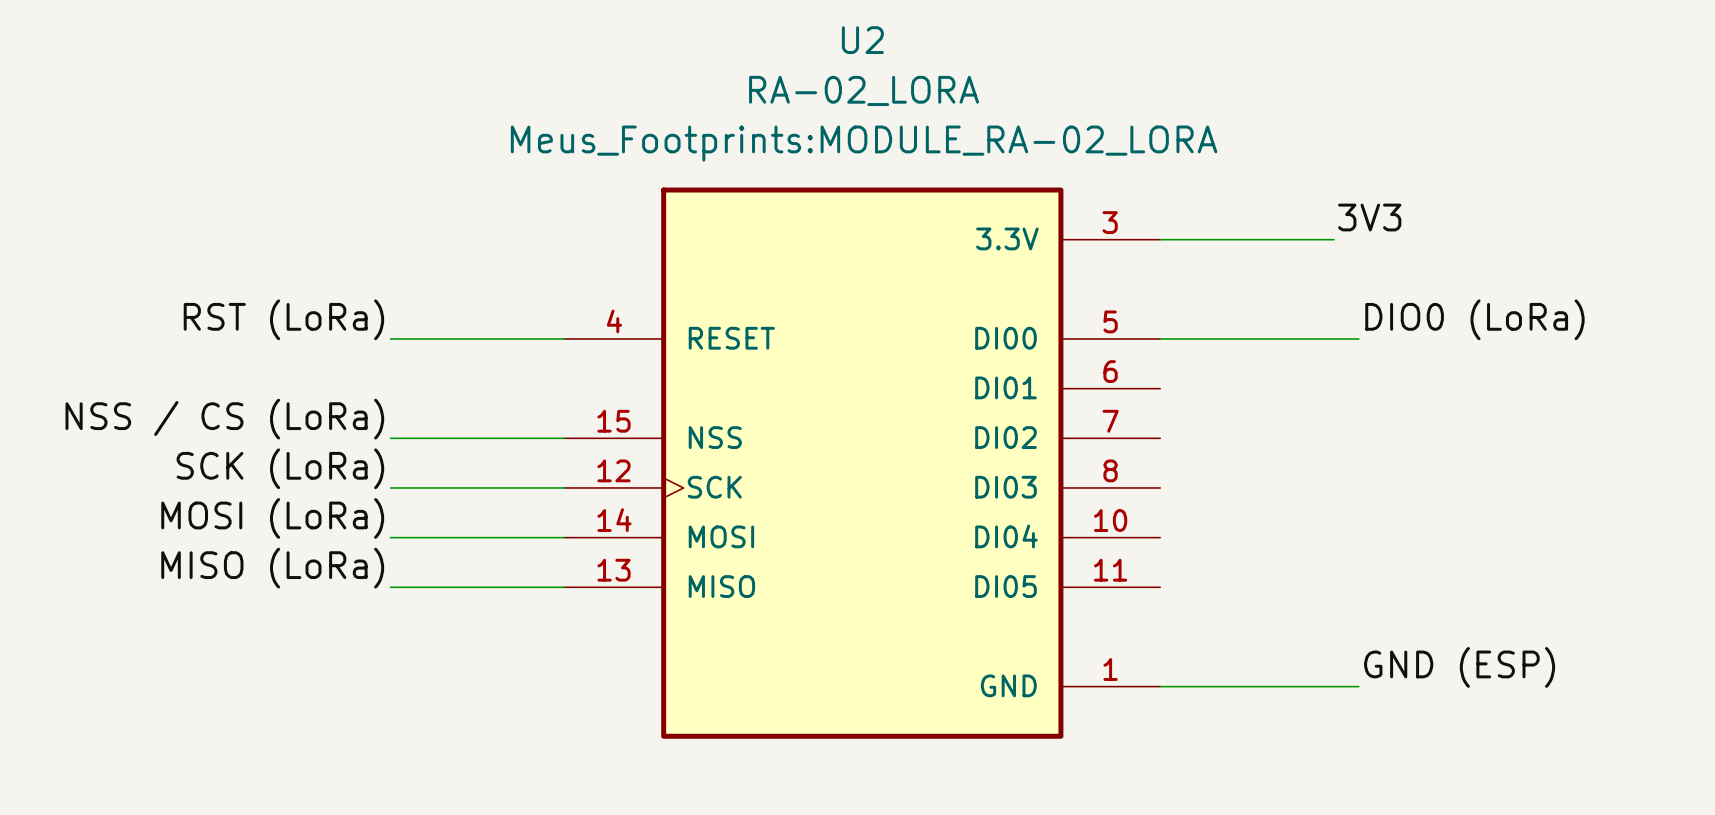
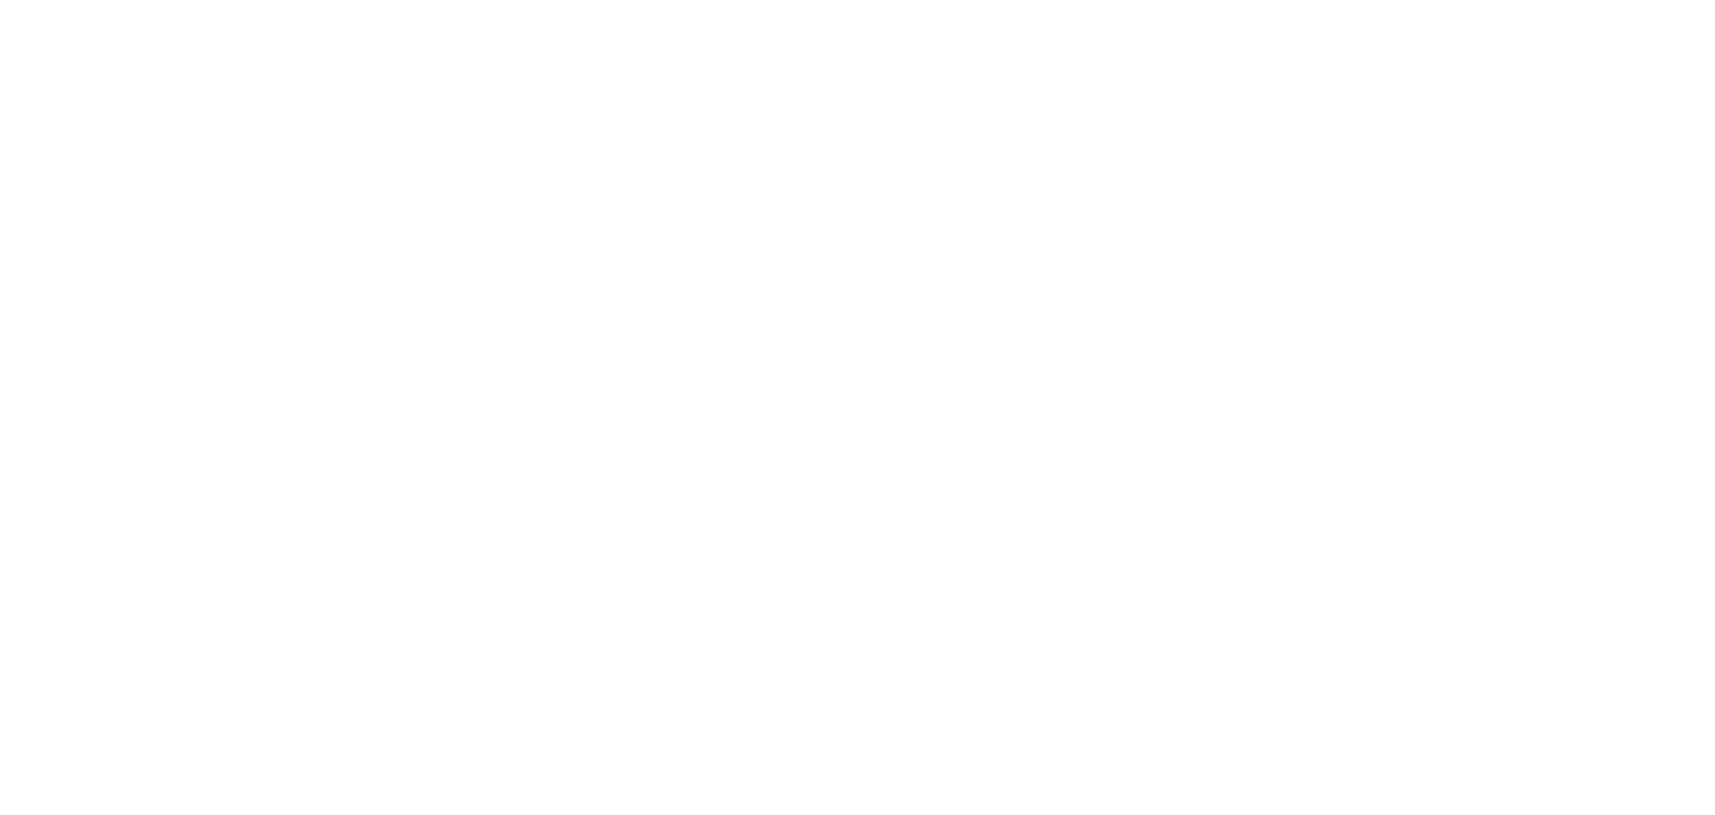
label: 3V3 (1369, 217) -> none
wire: (1160, 239) (1334, 239) -> none
label: RST (LoRa) (283, 319) -> none
label: DIO0 (LoRa) (1474, 319) -> none
wire: (390, 339) (564, 339) -> none
wire: (1160, 339) (1358, 339) -> none
label: NSS / CS (LoRa) (224, 419) -> none
wire: (390, 438) (564, 438) -> none
U2: RA-02_LORA (862, 463) -> none
label: SCK (LoRa) (280, 468) -> none
wire: (390, 487) (564, 487) -> none
label: MOSI (LoRa) (272, 518) -> none
wire: (390, 537) (564, 537) -> none
label: MISO (LoRa) (272, 568) -> none
wire: (390, 587) (564, 587) -> none
label: GND (ESP) (1459, 667) -> none
wire: (1160, 686) (1358, 686) -> none

